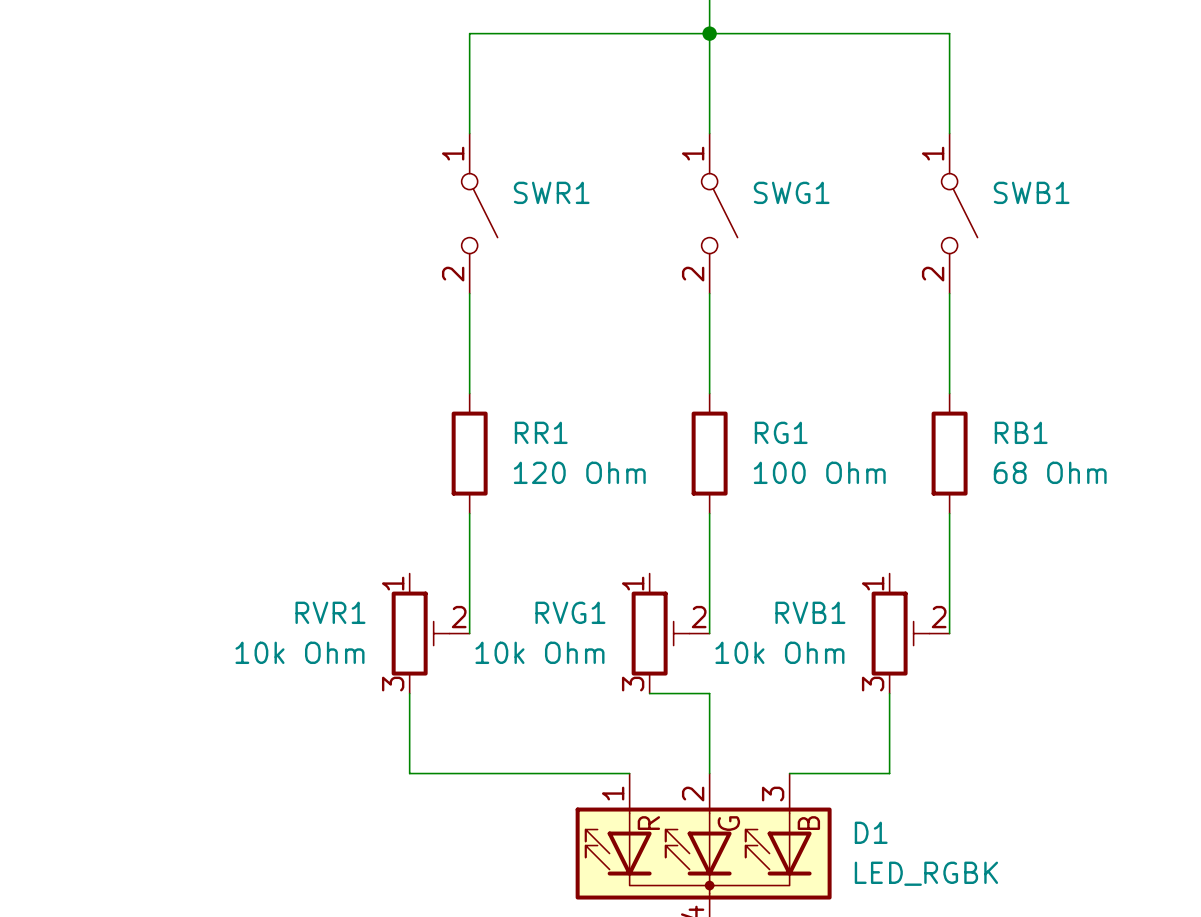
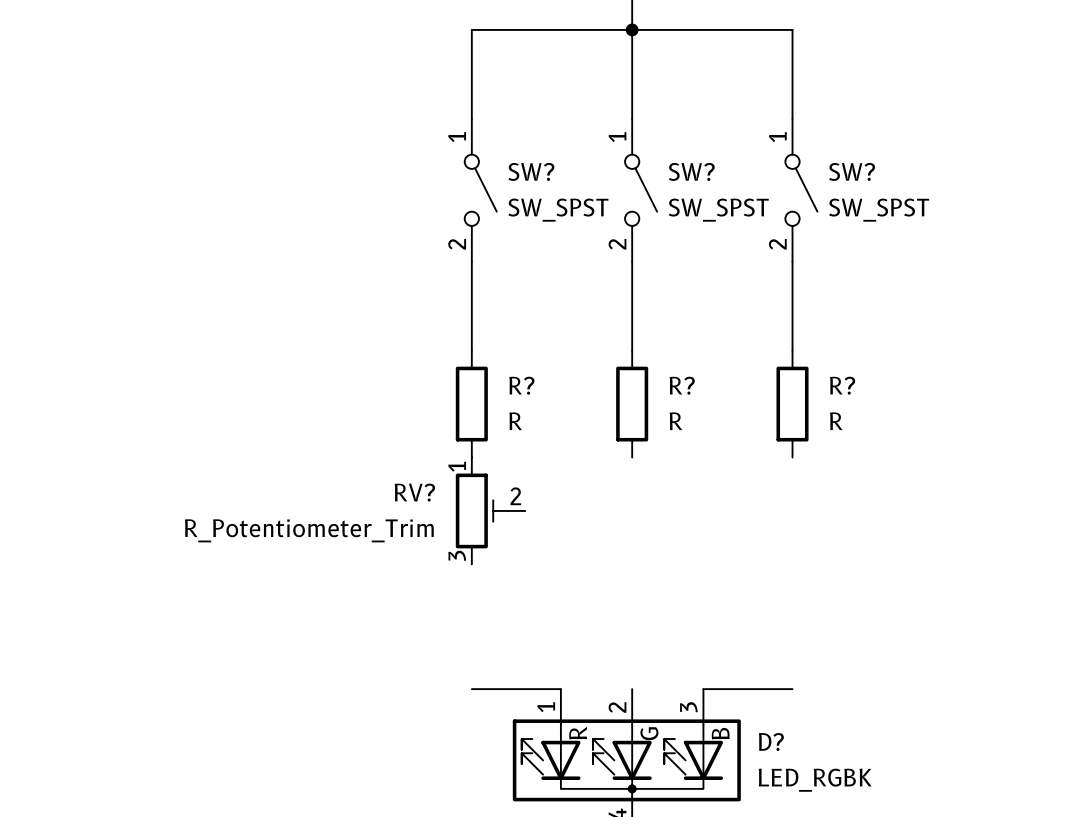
wire: (529, 33) (469, 33) (469, 133) -> (471, 29) (471, 119)
wire: (889, 33) (949, 33) (949, 133) -> (792, 29) (792, 119)
SWG1 name: SWG1 (791, 192) -> SW? (691, 171)
SWR1: (479, 213) -> none
SW?: none -> SW_SPST (480, 190)
SW?: none -> SW_SPST (801, 190)
SWB1: (959, 213) -> none
SWG1 value: none -> SW_SPST (718, 210)
wire: (469, 293) (469, 393) -> (471, 261) (471, 350)
wire: (949, 293) (949, 393) -> (792, 261) (792, 350)
RG1 name: RG1 (781, 432) -> R? (682, 385)
RR1: 120 Ohm (469, 453) -> none
R?: none -> R (471, 404)
R?: none -> R (792, 404)
RB1: 68 Ohm (949, 453) -> none
RG1 value: 100 Ohm (819, 472) -> R (675, 421)
wire: (469, 513) (469, 633) -> none
wire: (709, 513) (709, 633) -> none
wire: (949, 513) (949, 633) -> none
RV?: none -> R_Potentiometer_Trim (490, 510)
RVR1: 10k Ohm (430, 633) -> none
RVG1: 10k Ohm (670, 633) -> none
RVB1: 10k Ohm (910, 633) -> none
wire: (409, 693) (409, 773) (529, 773) -> none
wire: (649, 693) (709, 693) (709, 773) -> none
wire: (889, 693) (889, 773) -> none
D1 name: D1 (871, 832) -> D? (771, 742)

